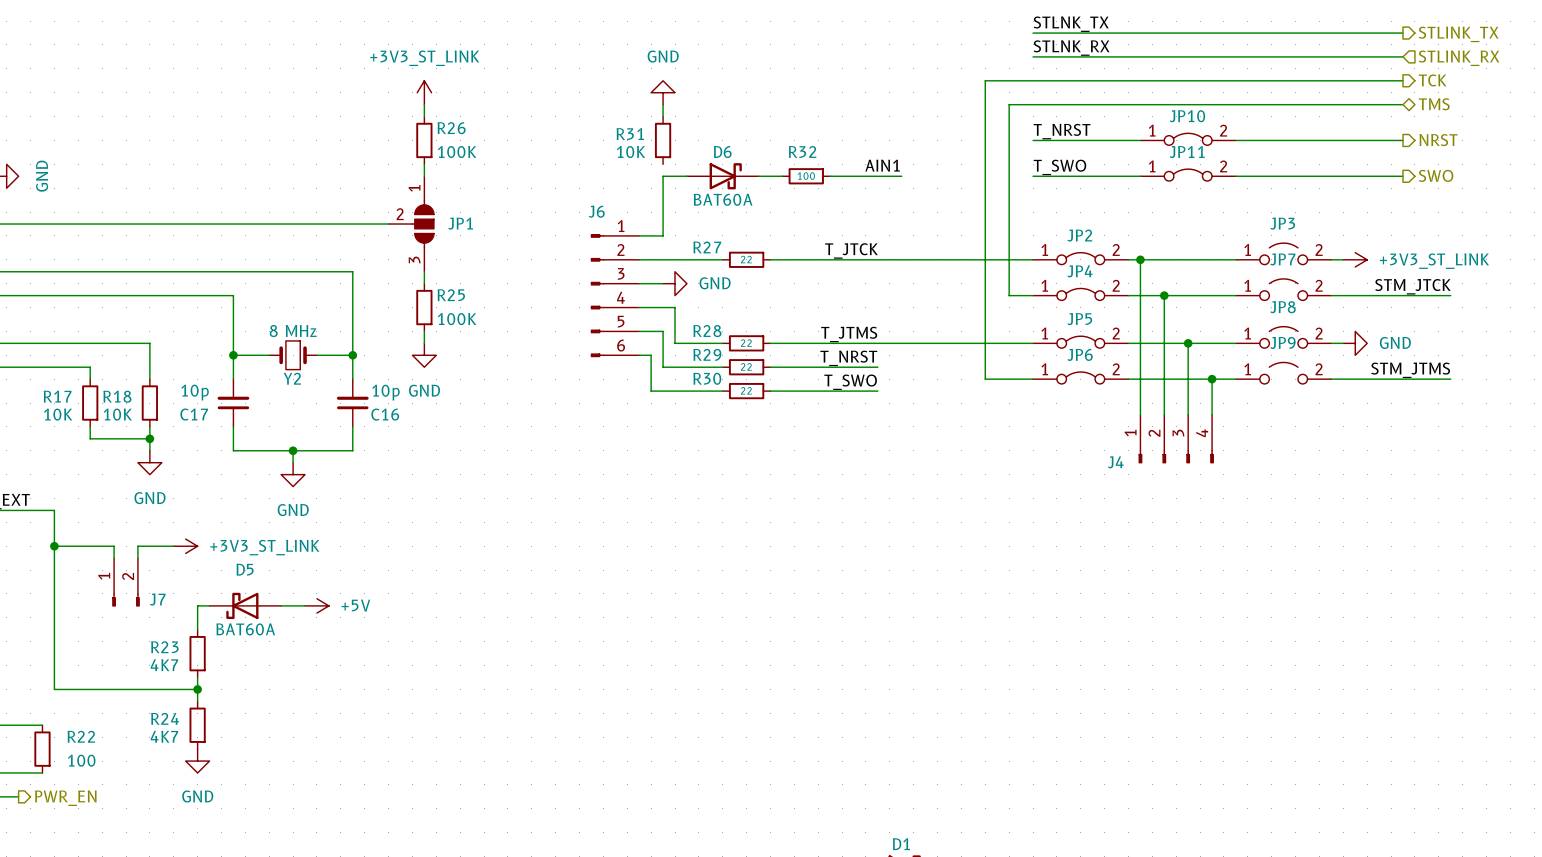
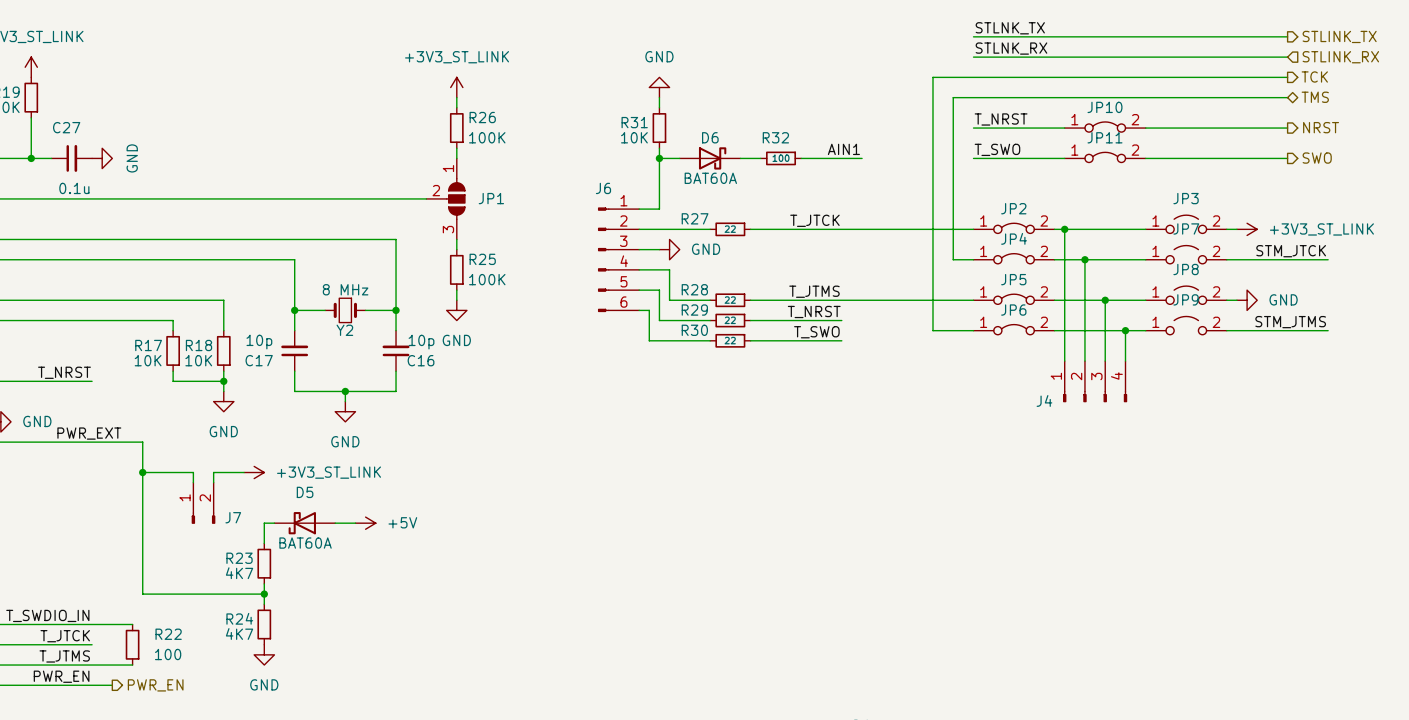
wire: none -> (659, 148) (659, 158)
junction: none -> (659, 158)

